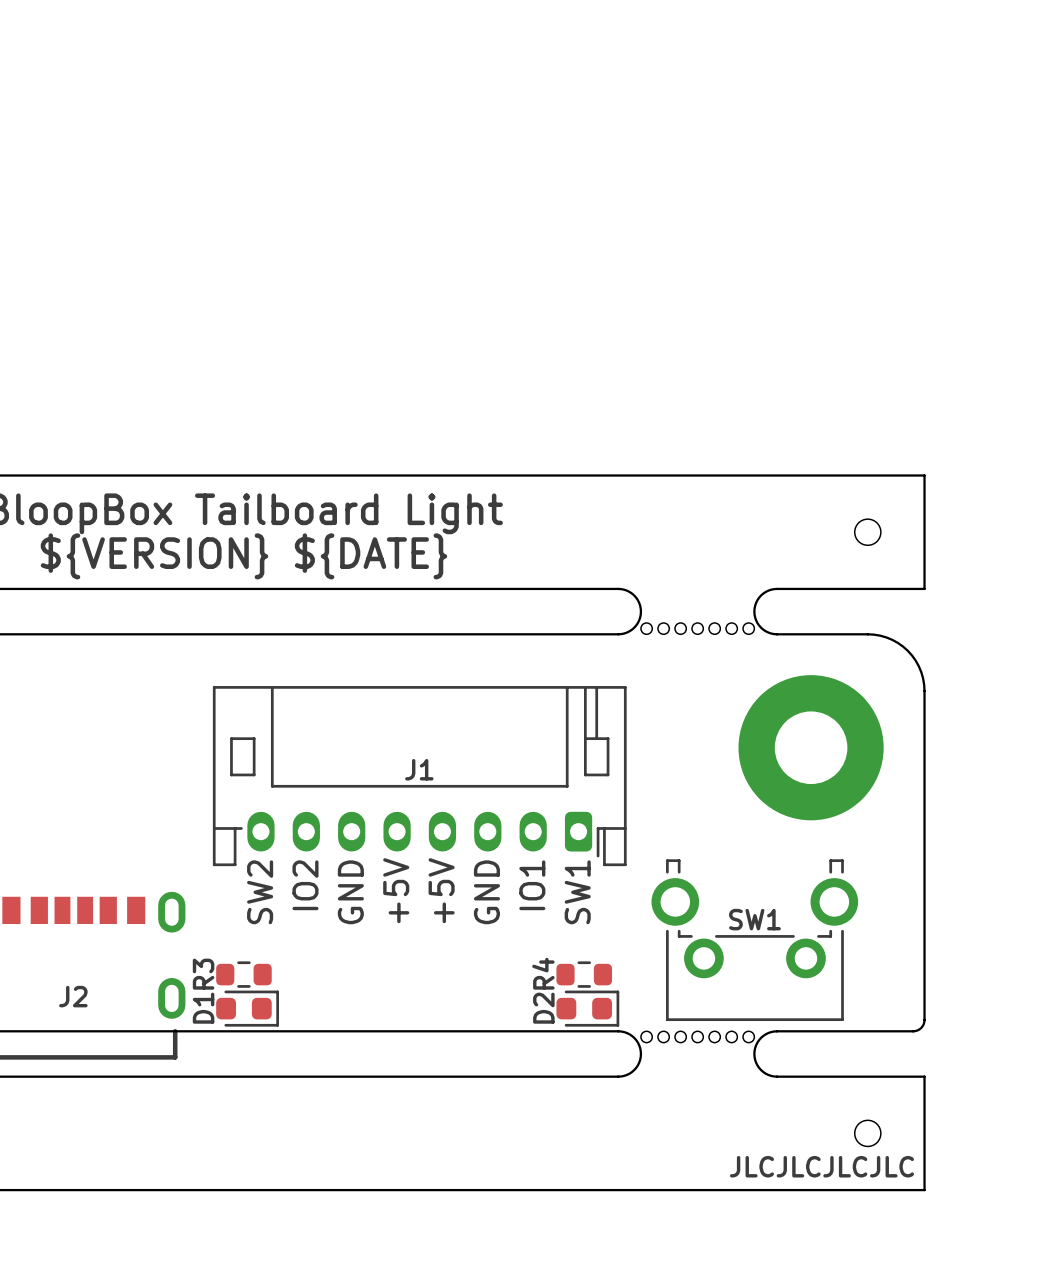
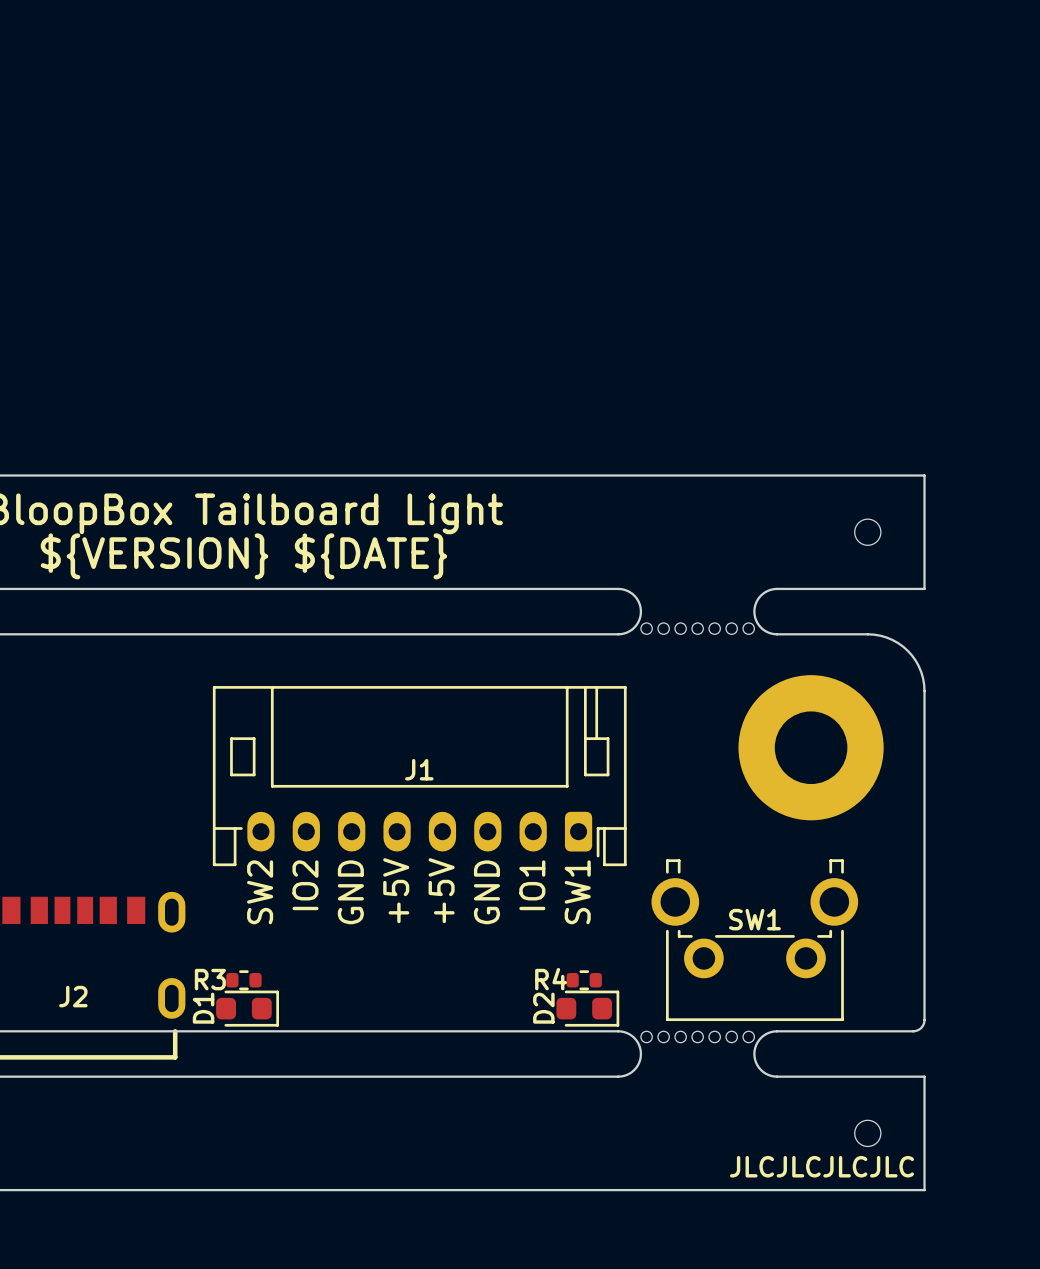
R3 footprint: [216, 961, 272, 988] -> [226, 970, 262, 991]
R4 footprint: [556, 961, 613, 988] -> [566, 970, 602, 991]
R4 name rotation: 0° (543, 973) -> 90° clockwise (551, 979)
R3 name rotation: 0° (203, 974) -> 90° clockwise (210, 979)

